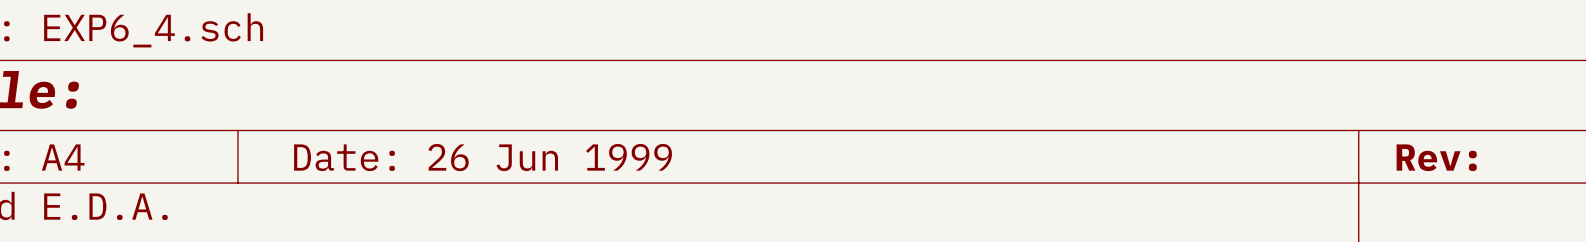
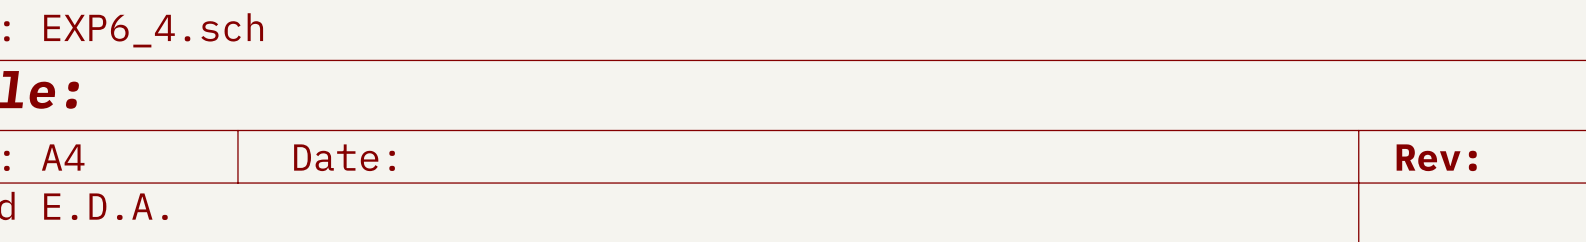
title block: Date: 26 Jun 1999 (483, 157) -> Date: (344, 157)

